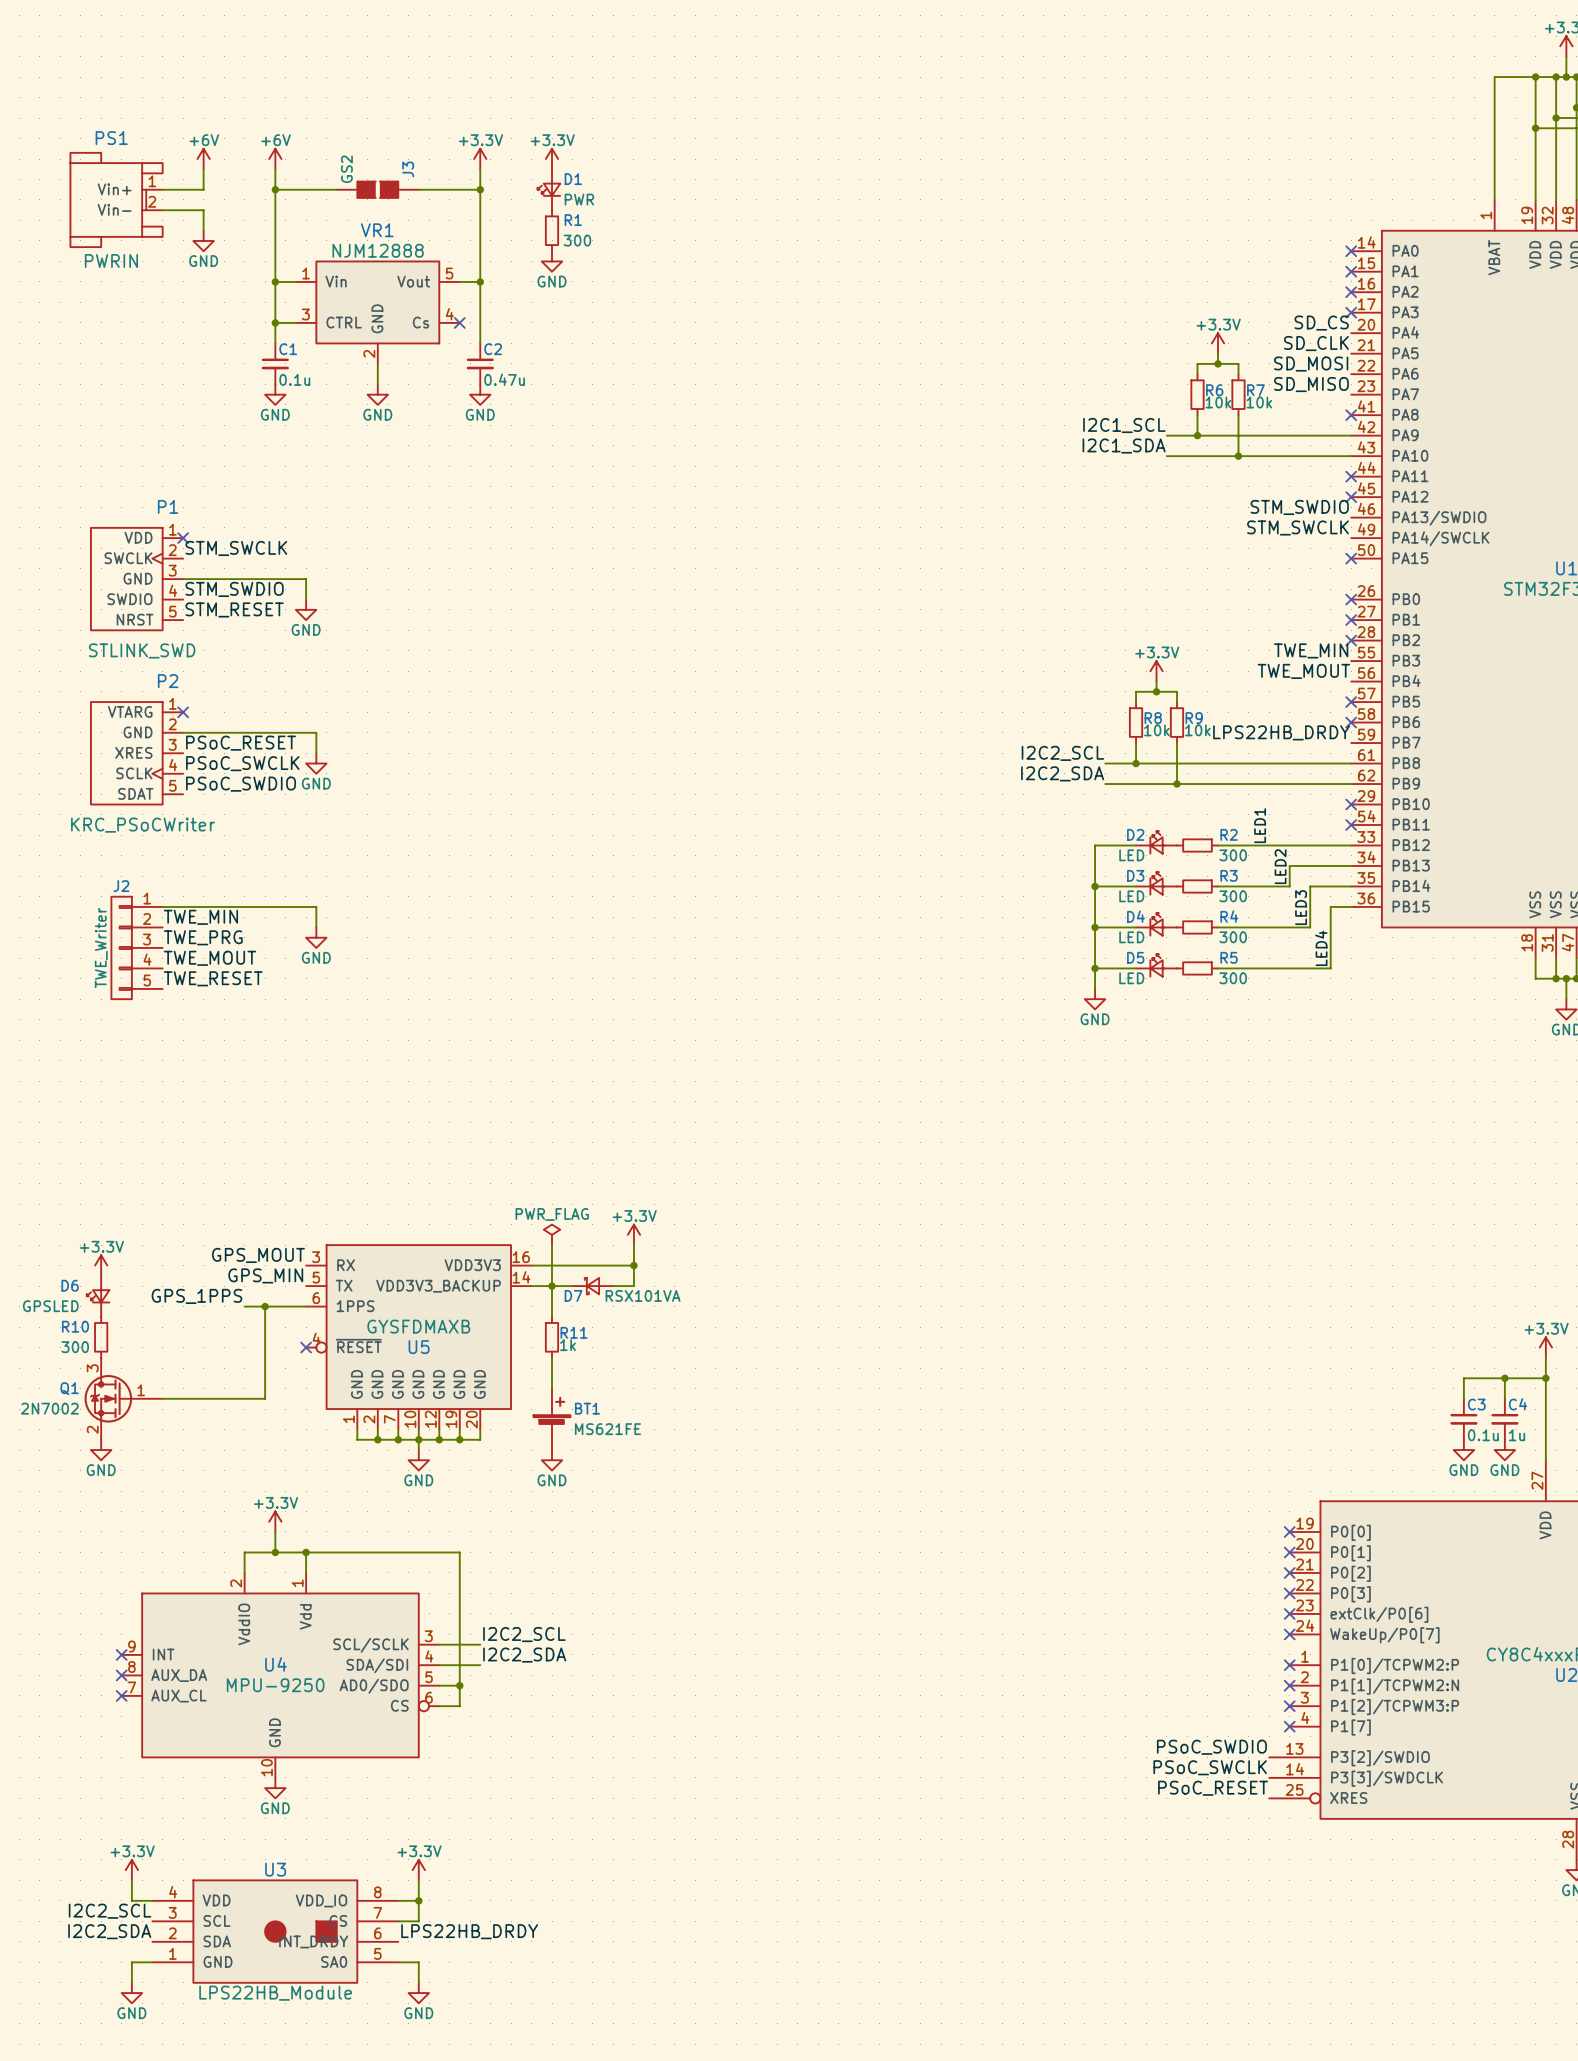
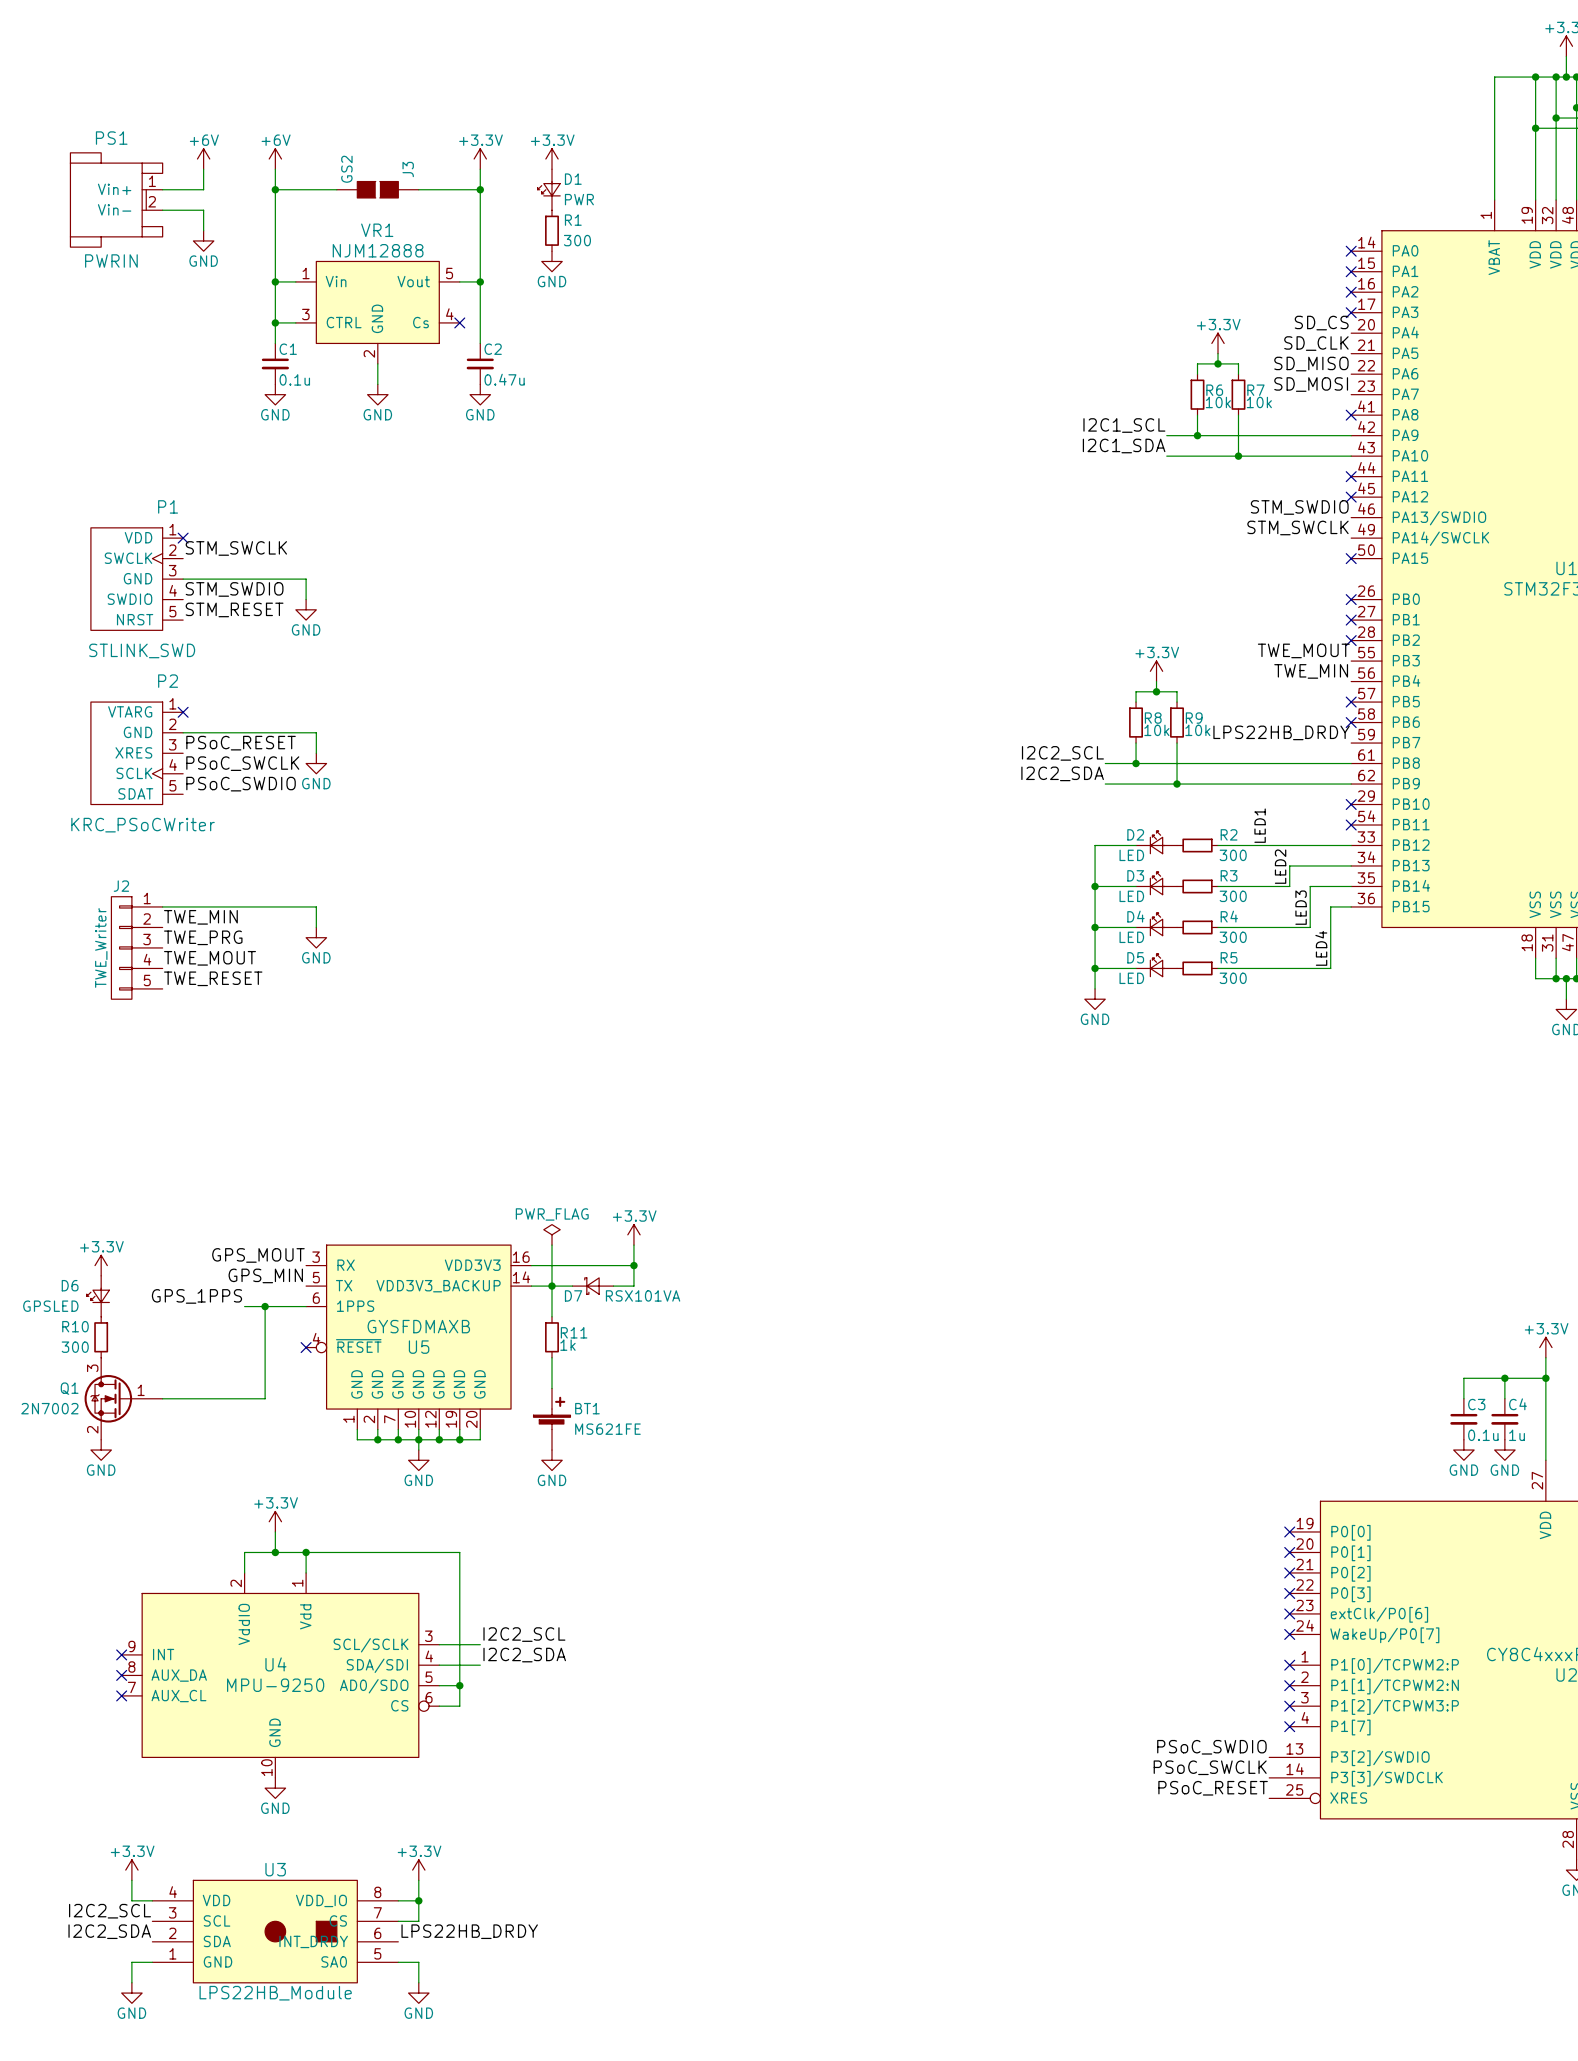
label: SD_MOSI (1311, 364) -> SD_MISO (1311, 364)
label: SD_MISO (1311, 384) -> SD_MOSI (1311, 384)
label: TWE_MIN (1311, 650) -> TWE_MOUT (1303, 650)
label: TWE_MOUT (1303, 671) -> TWE_MIN (1311, 671)

